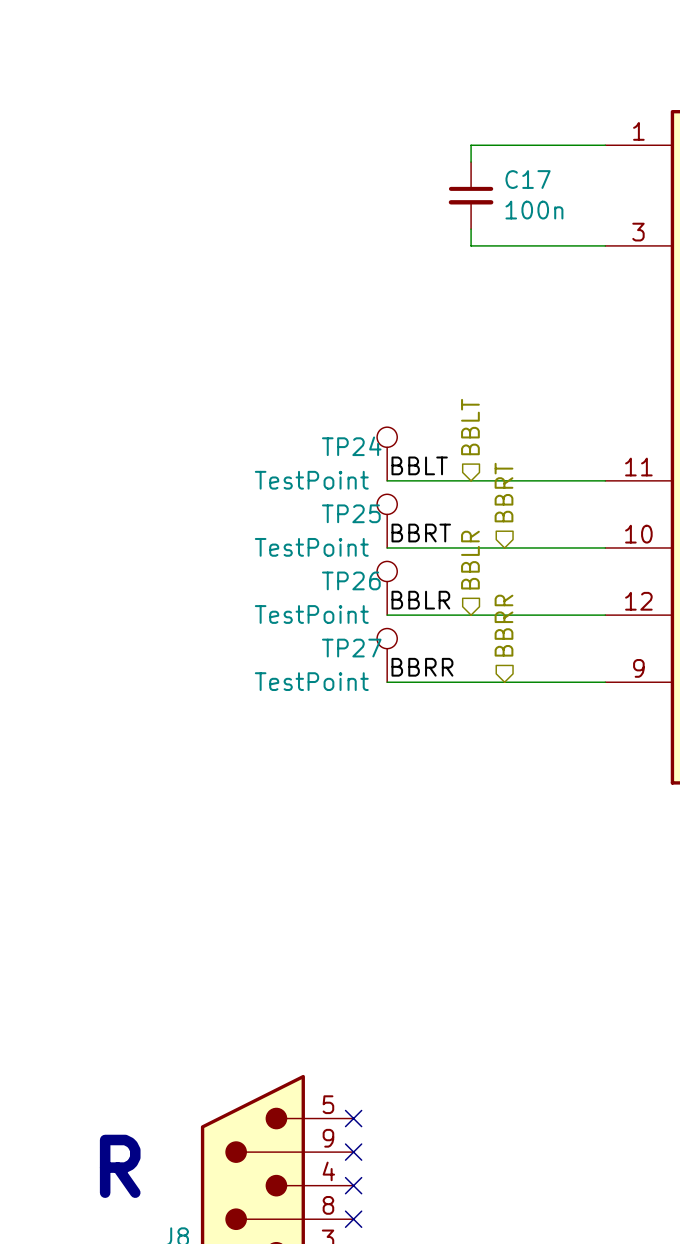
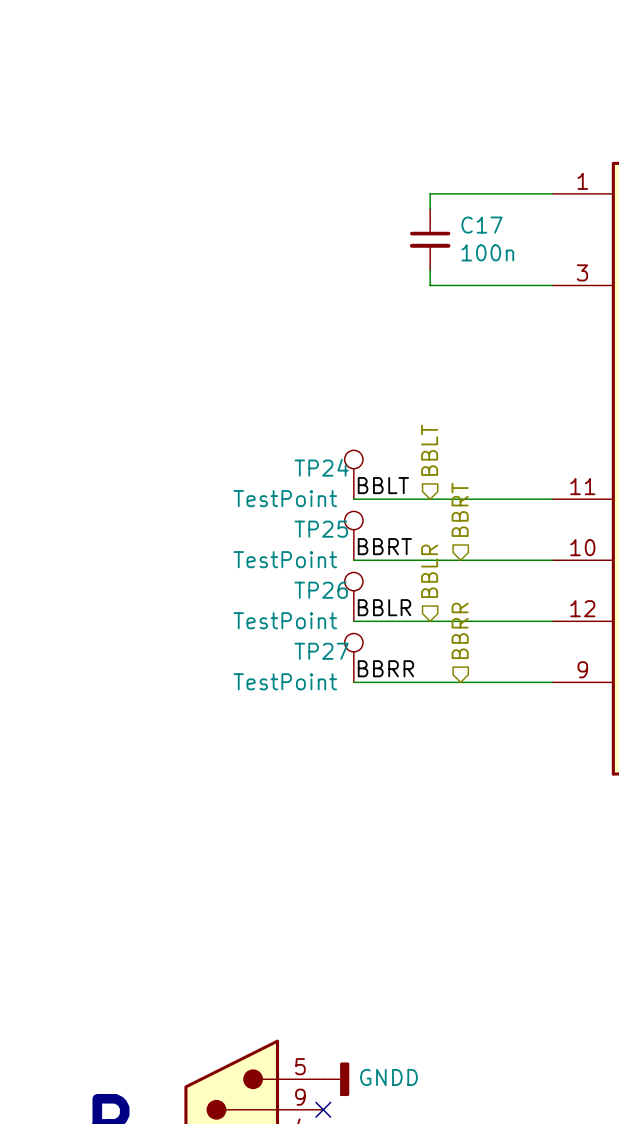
no-connect mark: (353, 1118) -> none
power symbol: none -> GNDD (336, 1079)

